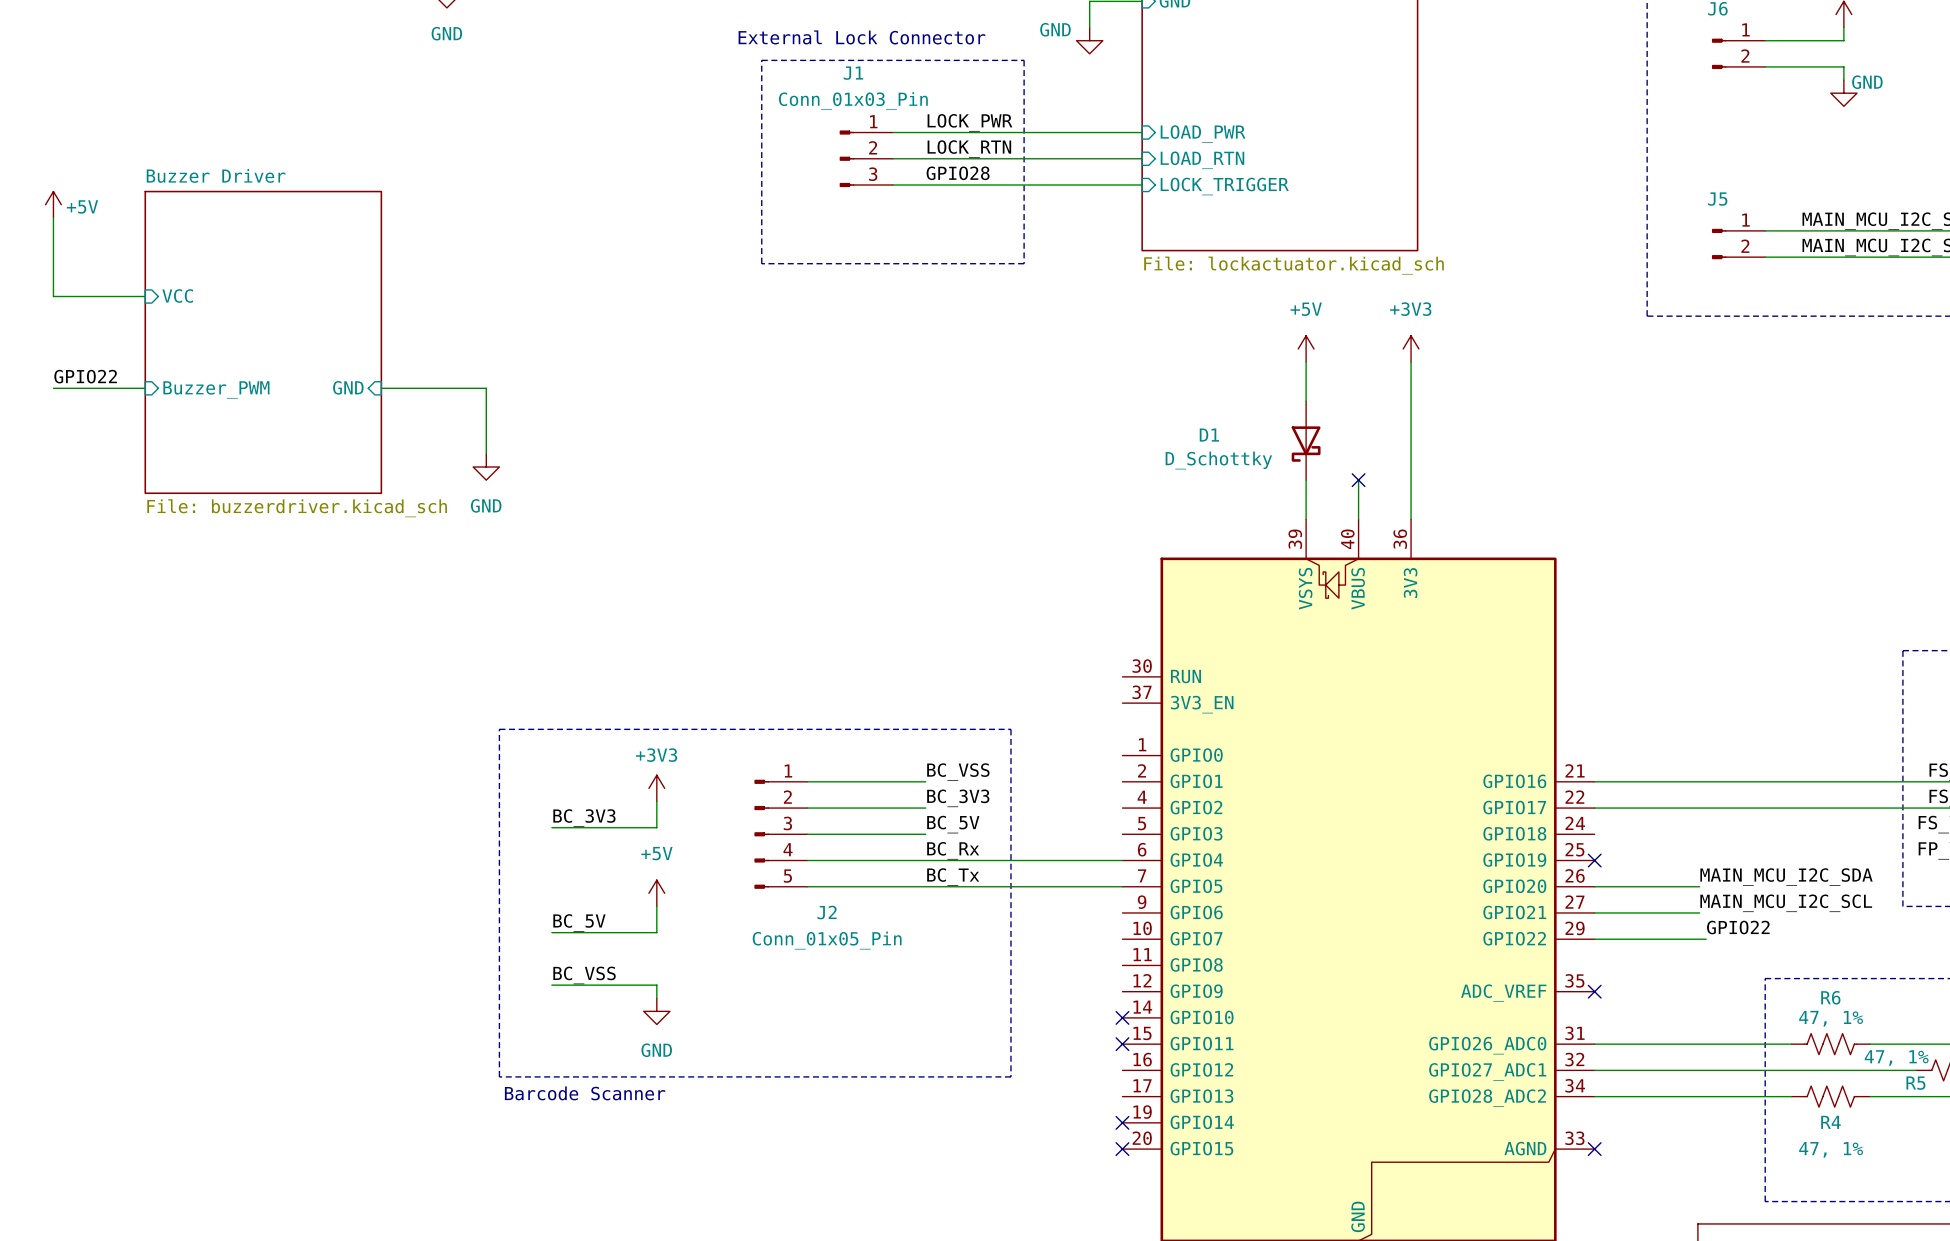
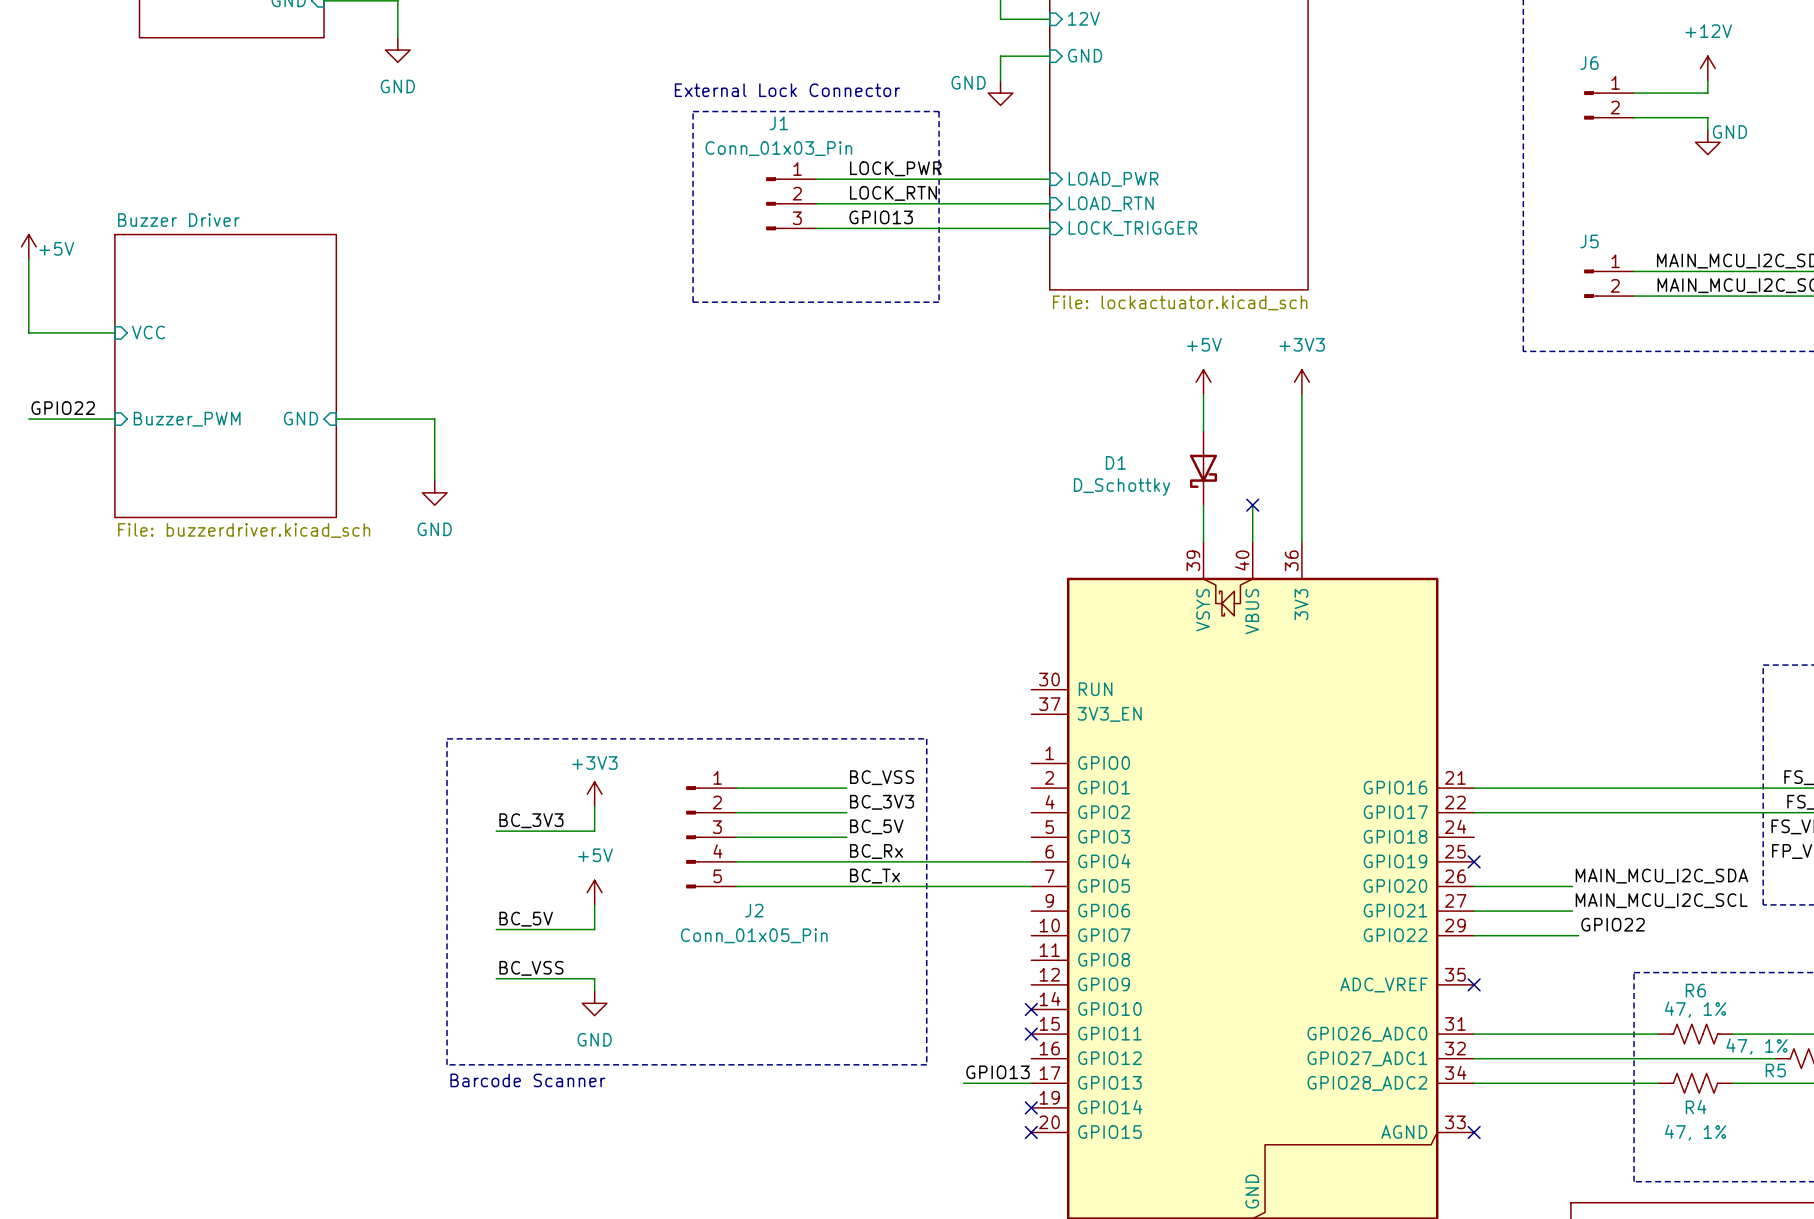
label: GPIO28 (958, 173) -> GPIO13 (881, 217)
label: none -> GPIO13 (998, 1072)
wire: none -> (963, 1083) (1031, 1083)

